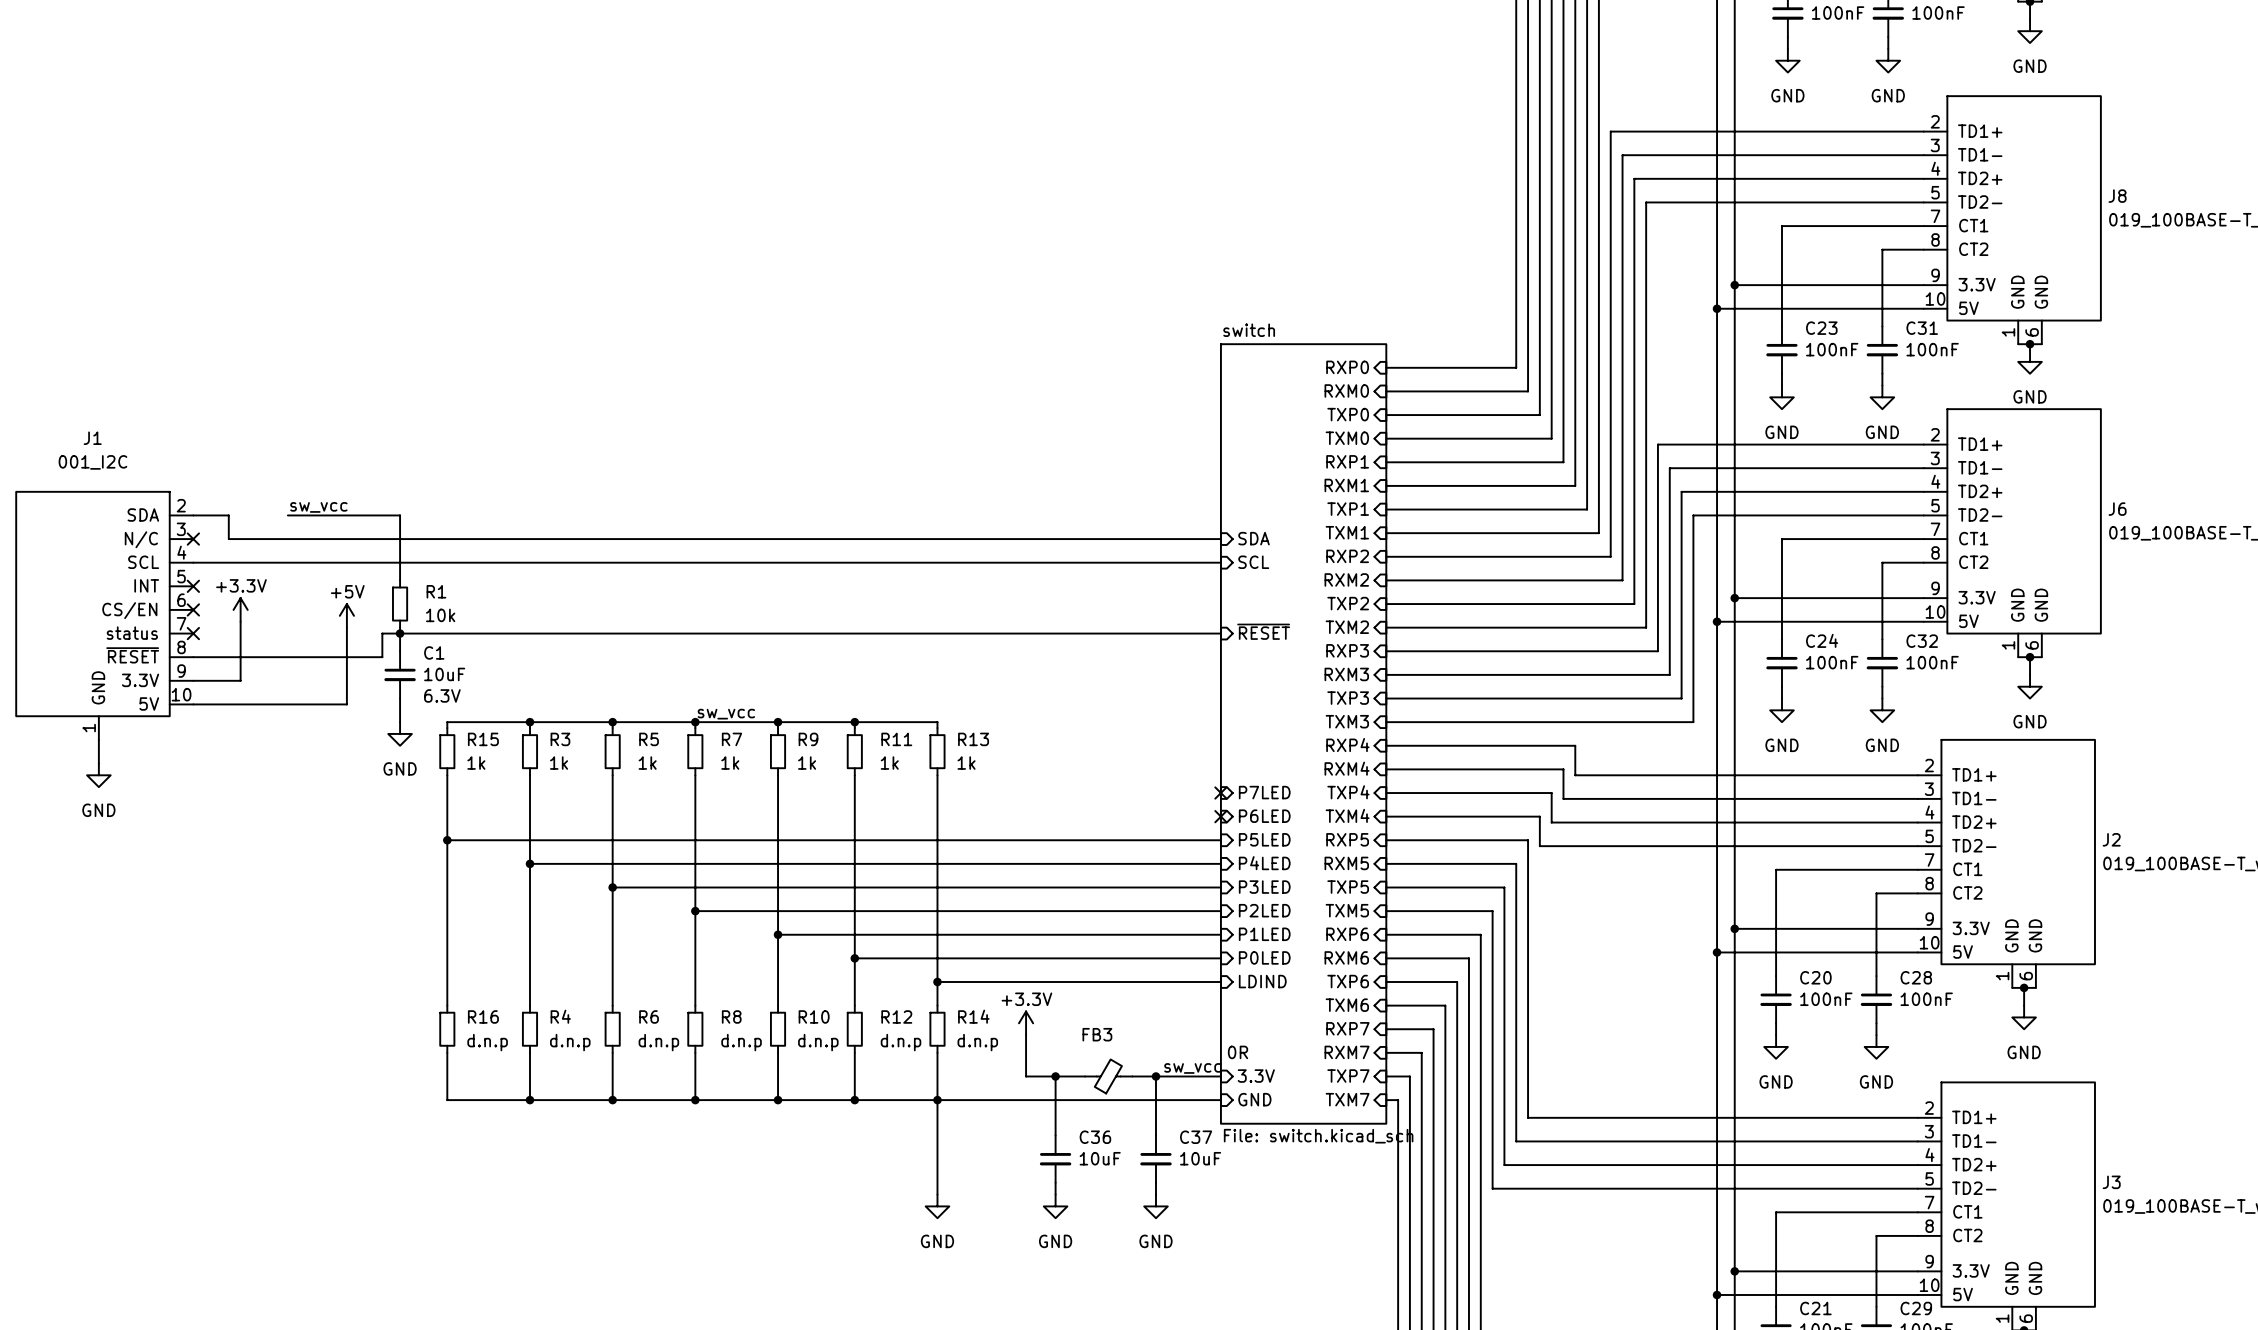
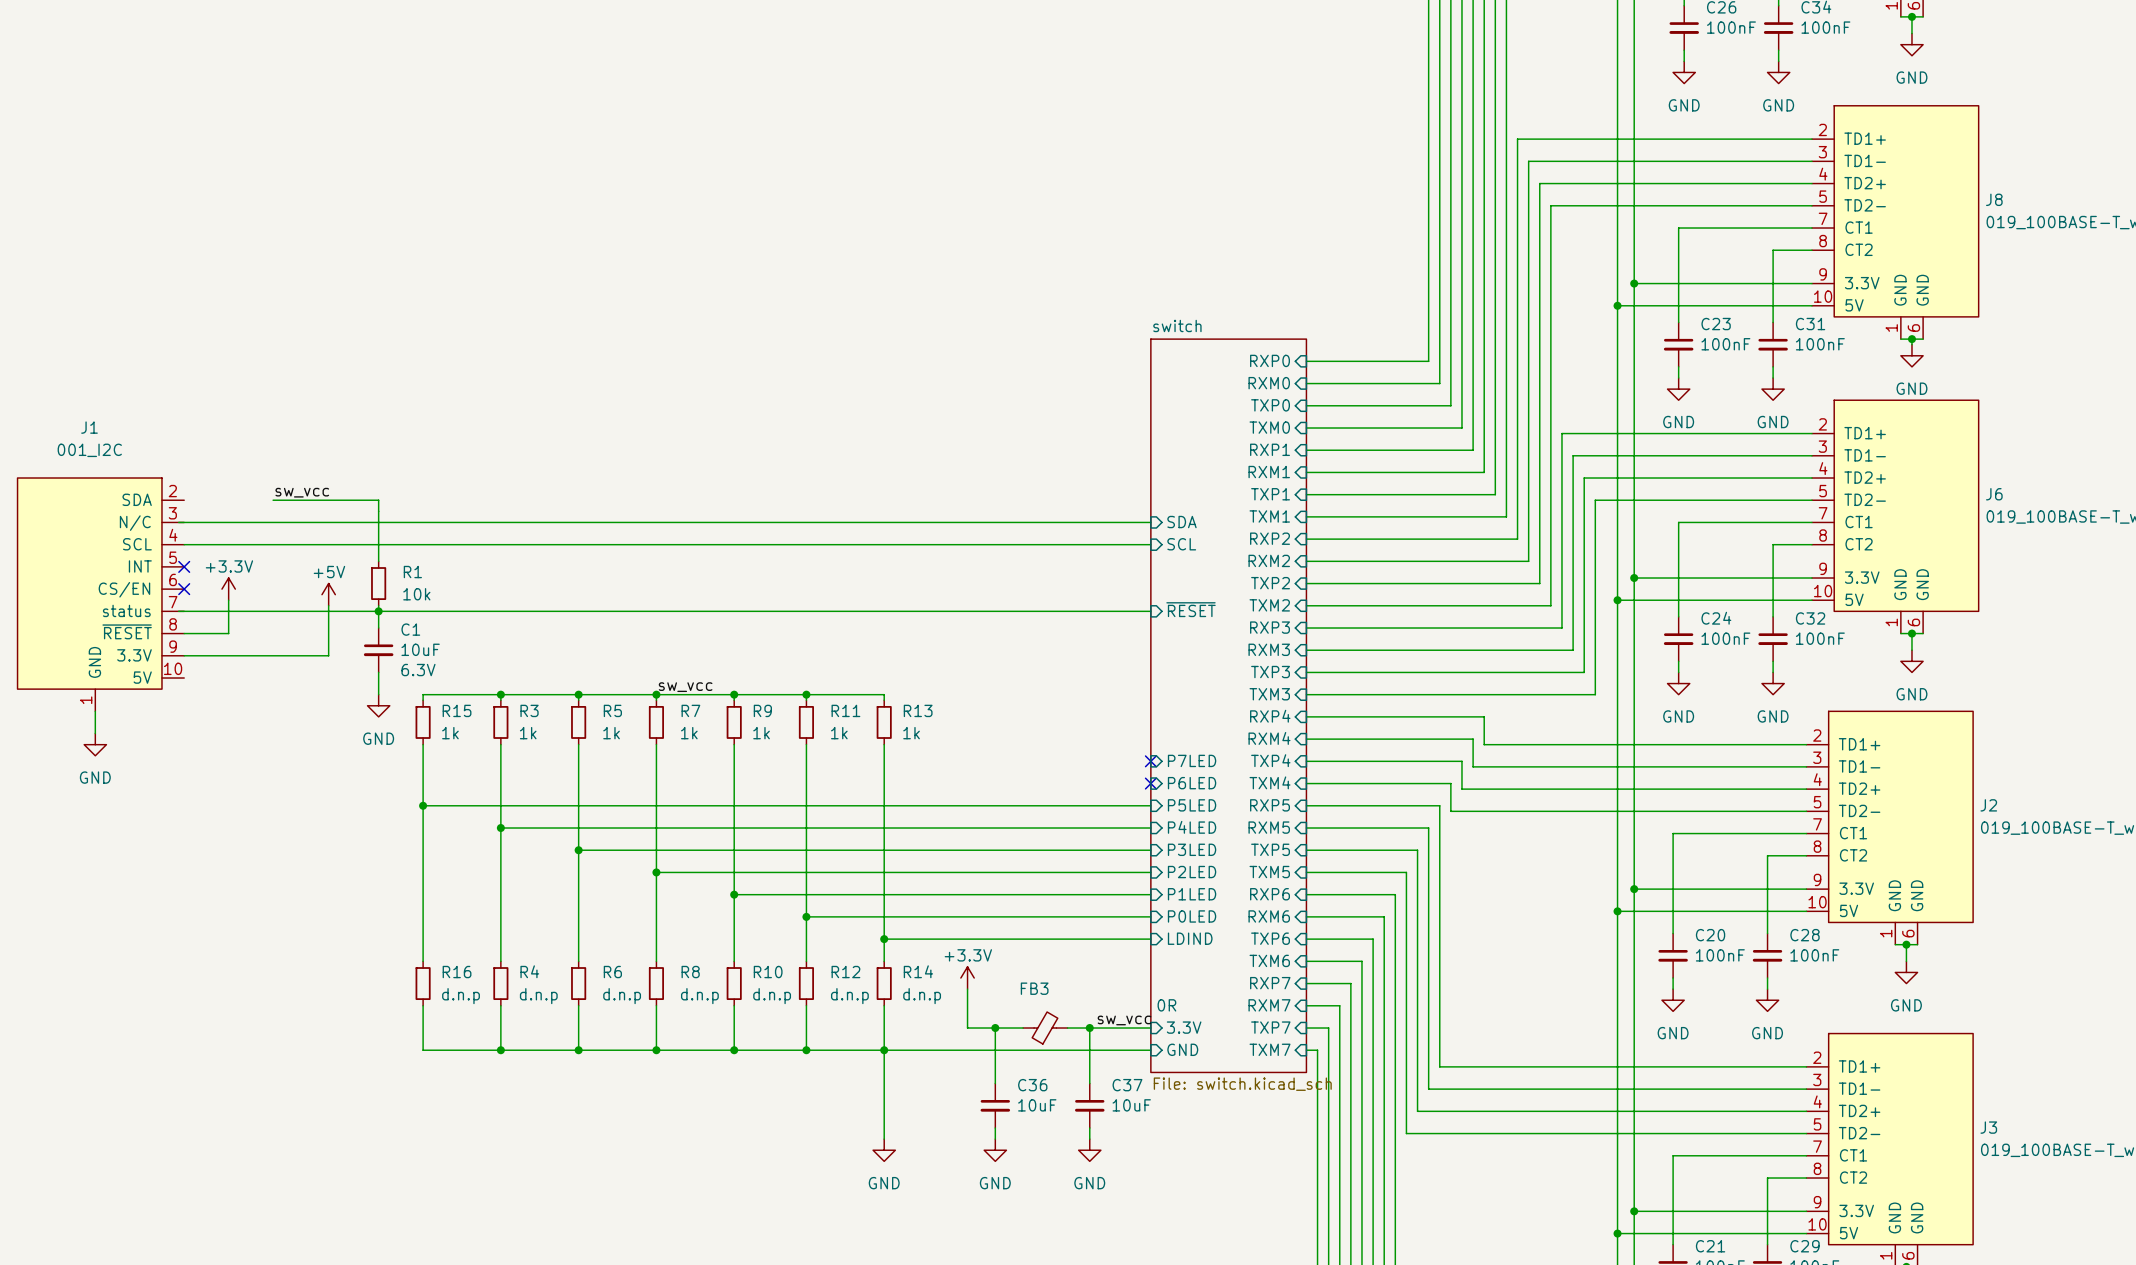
wire: (193, 515) (228, 515) (228, 539) -> (178, 522) (217, 522)
no-connect mark: (193, 539) -> none
no-connect mark: (193, 633) -> none
wire: (382, 633) (382, 657) (240, 657) (240, 680) -> (361, 611) (178, 611)
wire: (346, 680) (346, 704) (193, 704) -> (328, 655) (228, 655)

